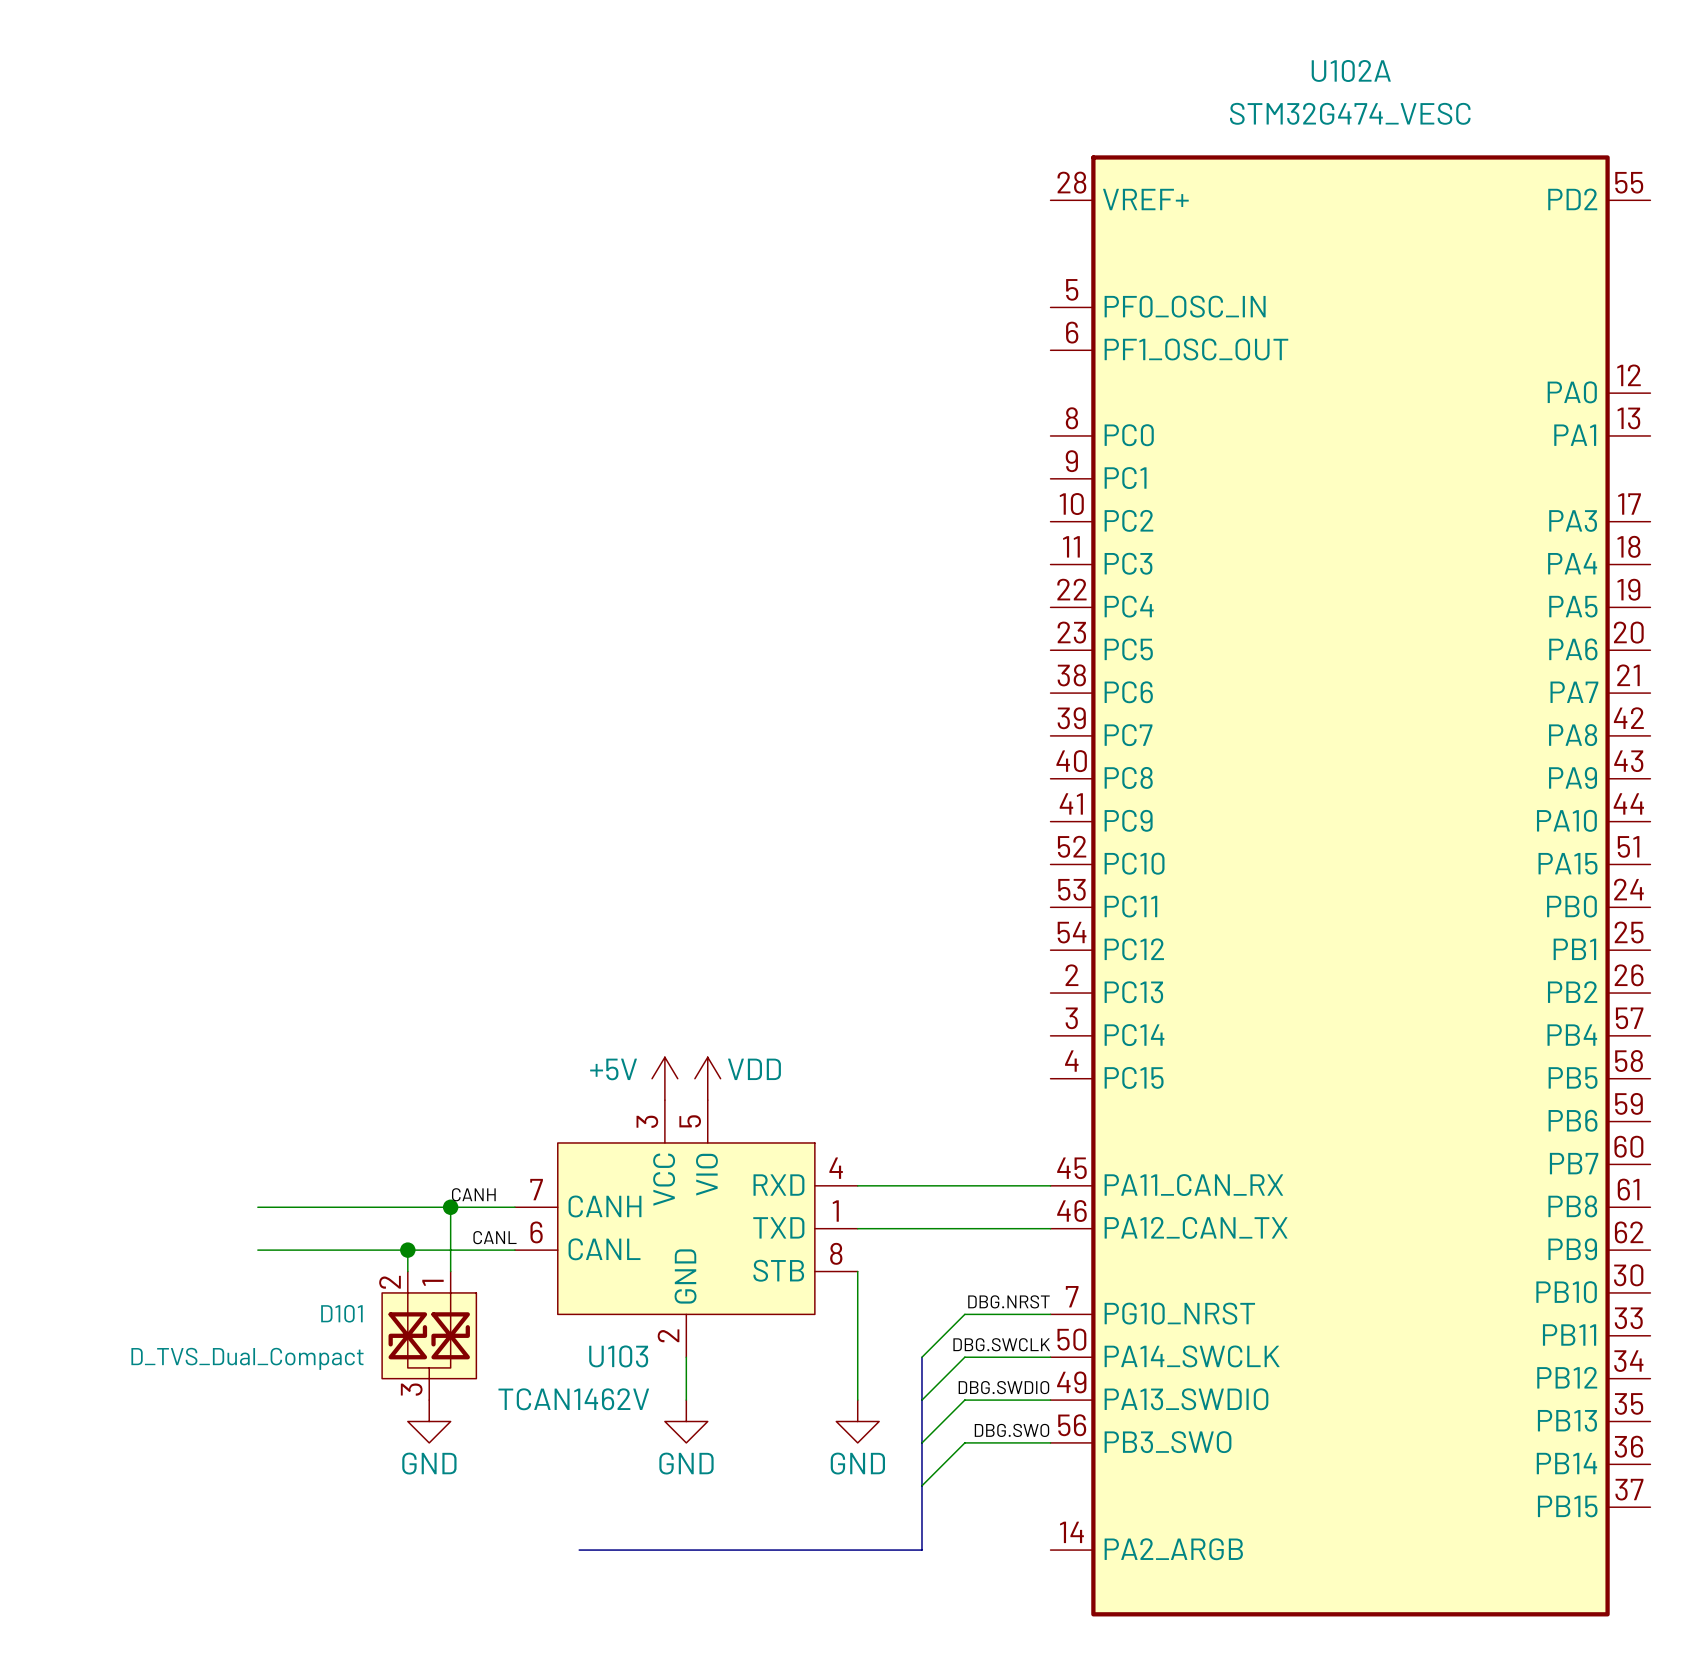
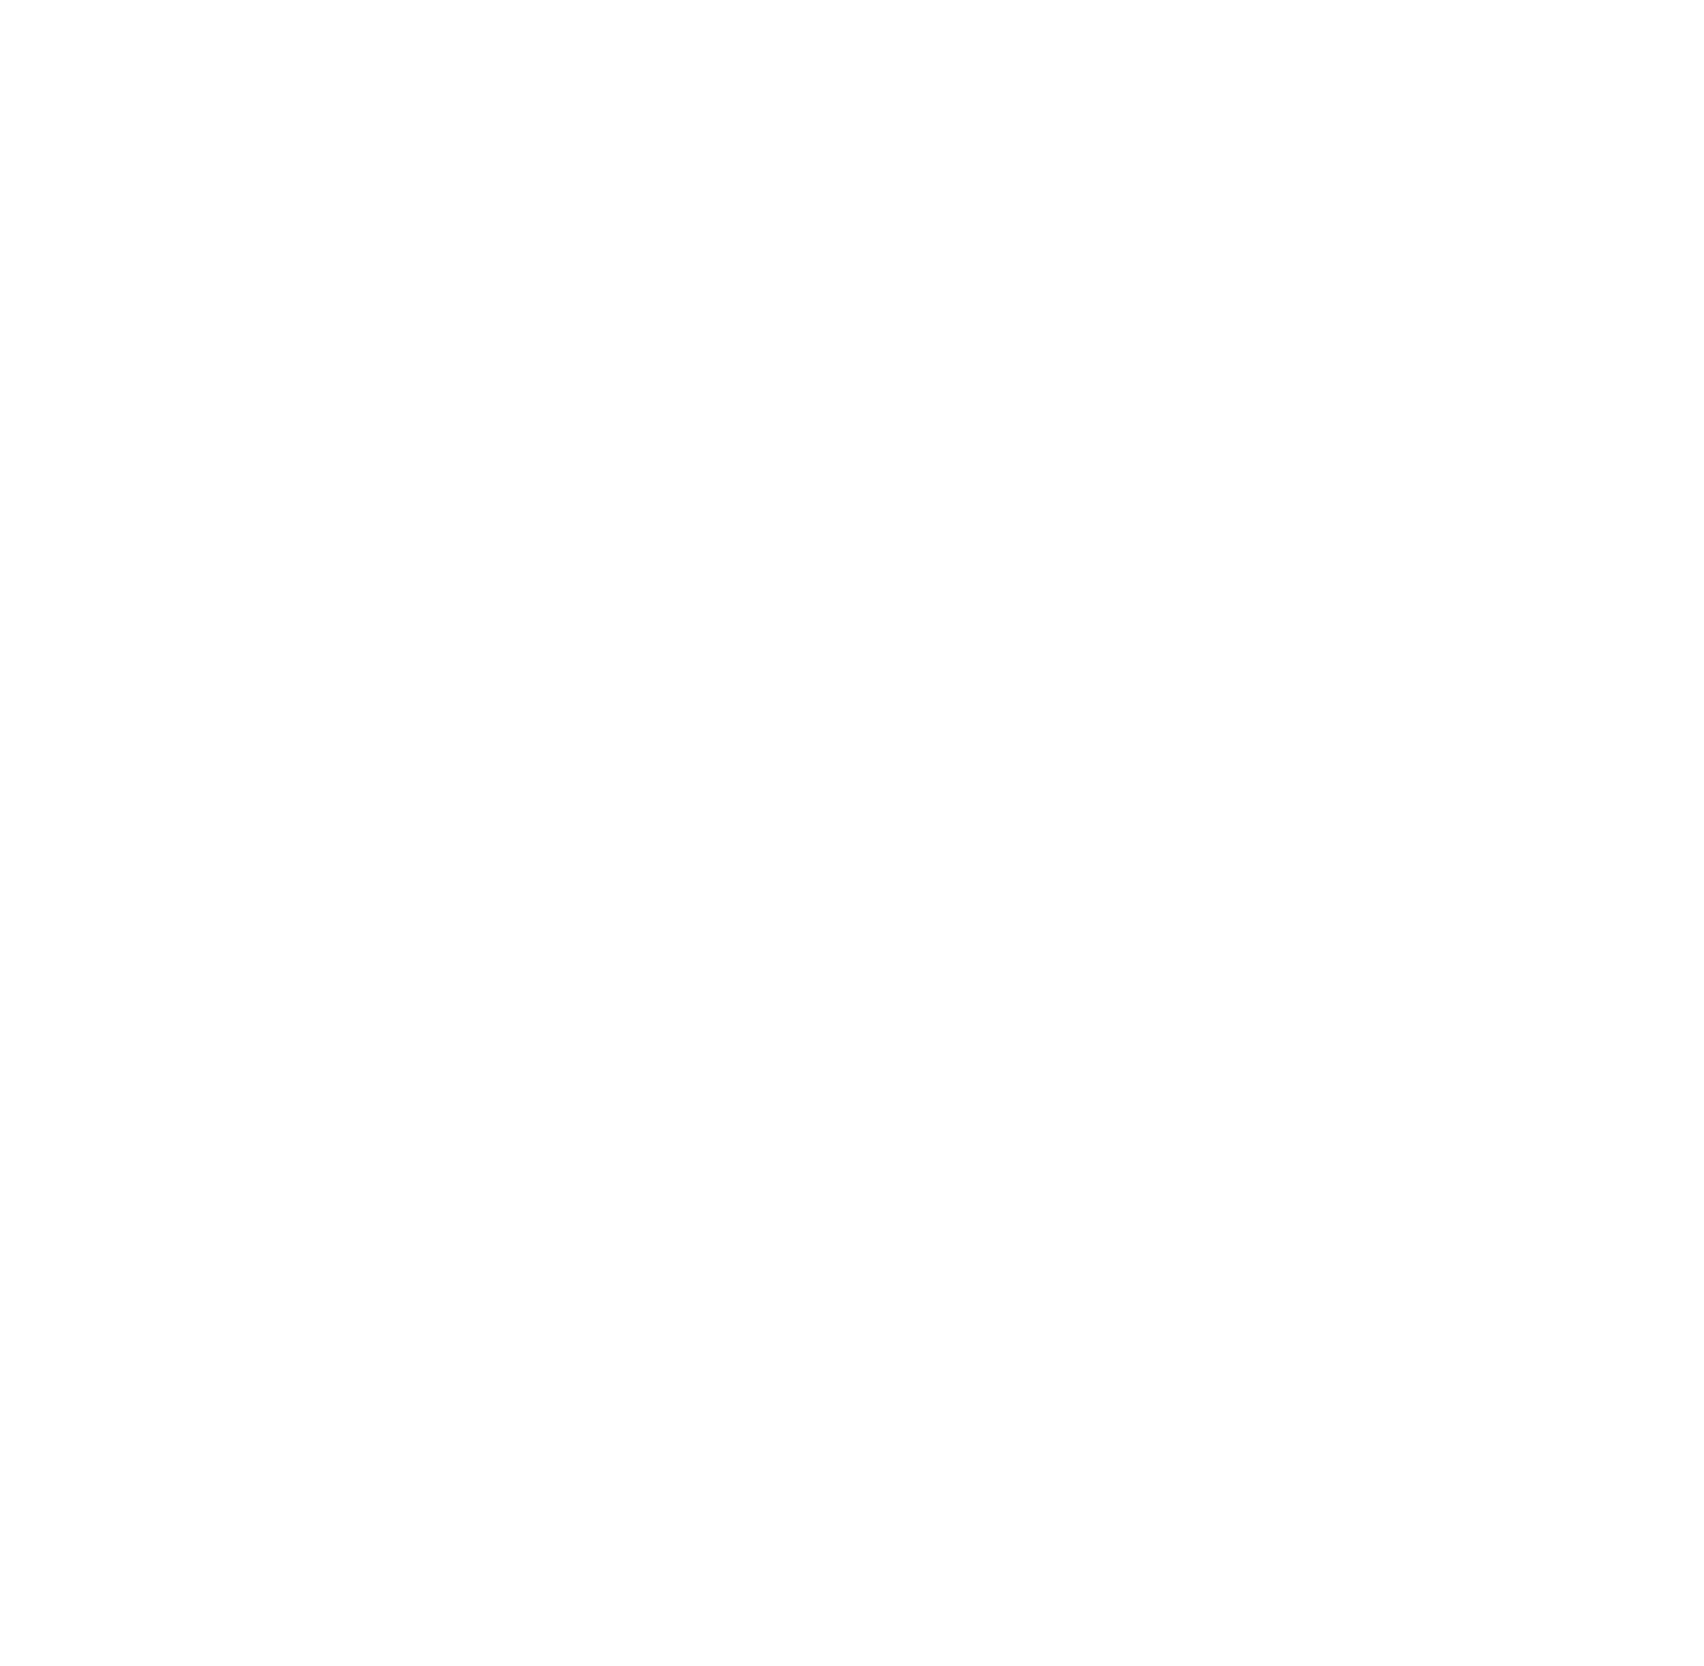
U102A: STM32G474_VESC (1350, 885) -> none
power symbol: +5V (664, 1078) -> none
power symbol: VDD (707, 1078) -> none
wire: (857, 1185) (1050, 1185) -> none
label: CANH (473, 1194) -> none
wire: (257, 1207) (514, 1207) -> none
wire: (450, 1207) (450, 1271) -> none
junction: (450, 1207) -> none
U103: TCAN1462V (686, 1228) -> none
wire: (857, 1228) (1050, 1228) -> none
label: CANL (494, 1237) -> none
wire: (257, 1250) (514, 1250) -> none
wire: (407, 1250) (407, 1271) -> none
junction: (407, 1250) -> none
wire: (857, 1271) (857, 1400) -> none
label: DBG.NRST (1008, 1301) -> none
wire: (1050, 1314) (964, 1314) (921, 1357) -> none
D101: D_TVS_Dual_Compact (429, 1335) -> none
label: DBG.SWCLK (1001, 1344) -> none
wire: (686, 1357) (686, 1400) -> none
bus: (921, 1357) (921, 1550) (579, 1550) -> none
wire: (1050, 1357) (964, 1357) (921, 1400) -> none
label: DBG.SWDIO (1003, 1387) -> none
wire: (1050, 1400) (964, 1400) (921, 1442) -> none
power symbol: GND (429, 1421) -> none
power symbol: GND (686, 1421) -> none
power symbol: GND (857, 1421) -> none
label: DBG.SWO (1011, 1430) -> none
wire: (1050, 1442) (964, 1442) (921, 1485) -> none

